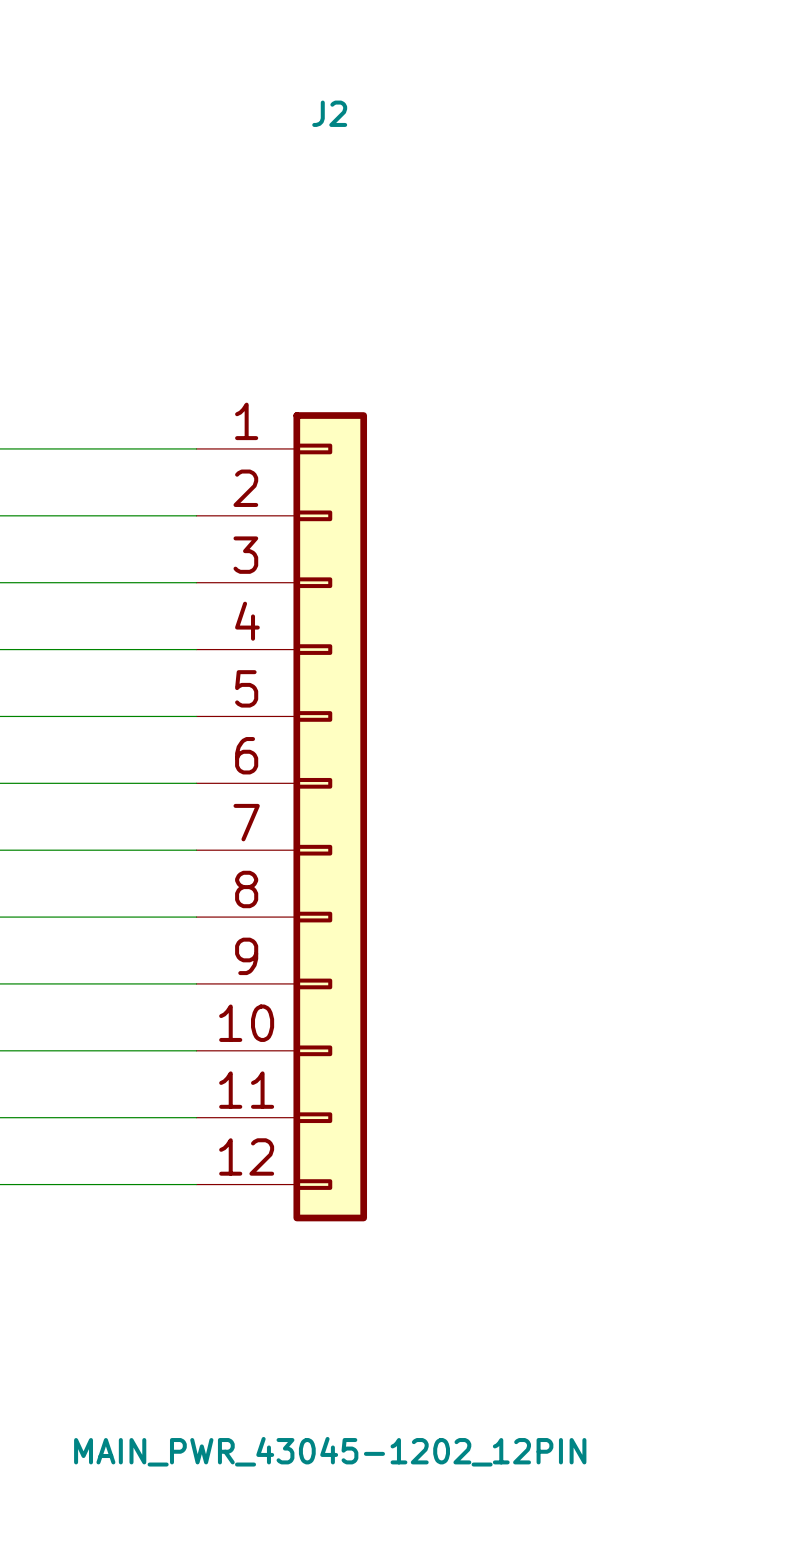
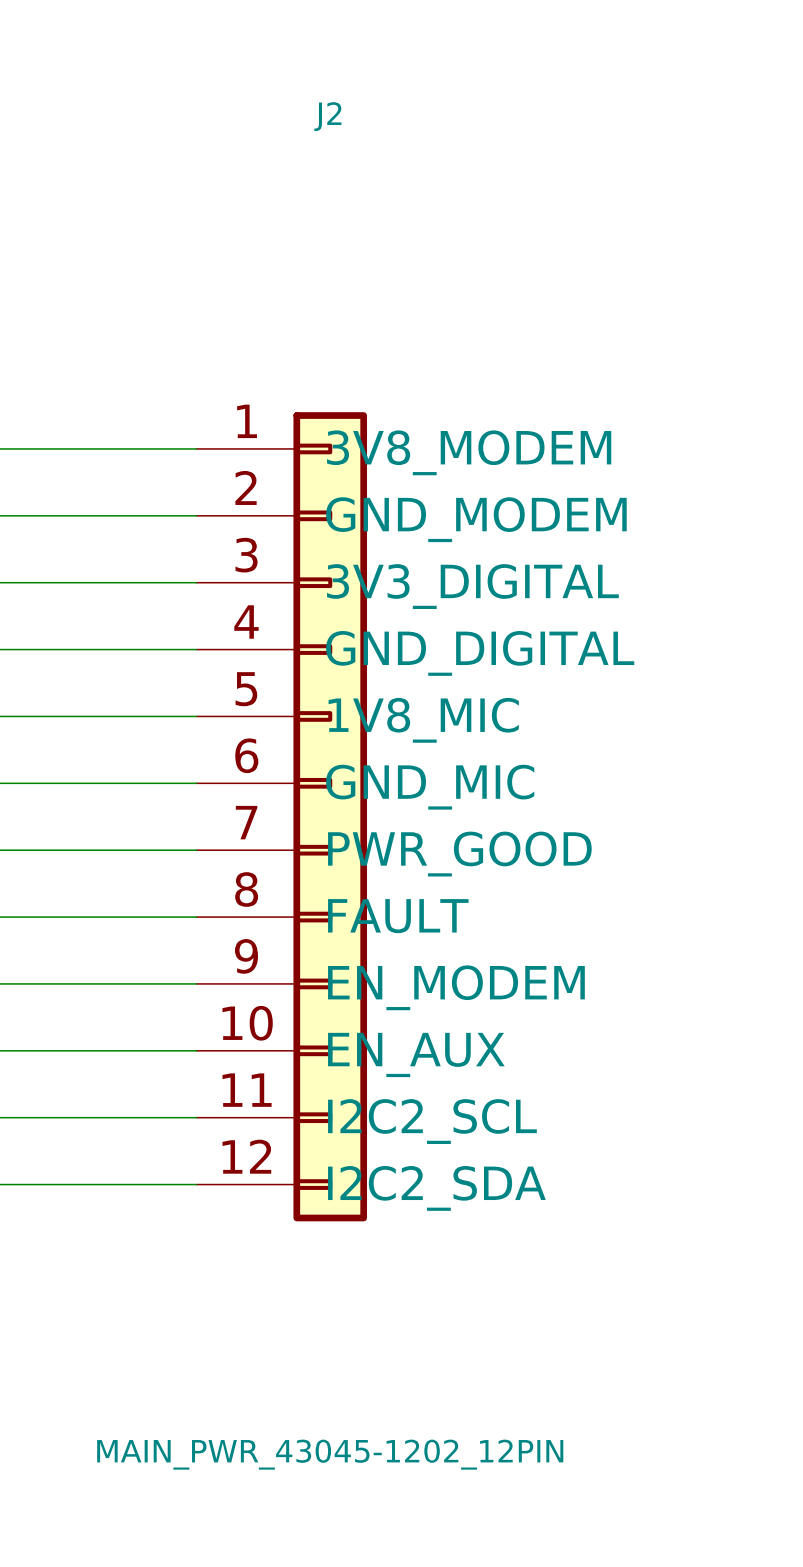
J2 symbol: [196, 412, 368, 1222] -> [196, 412, 368, 1222]

